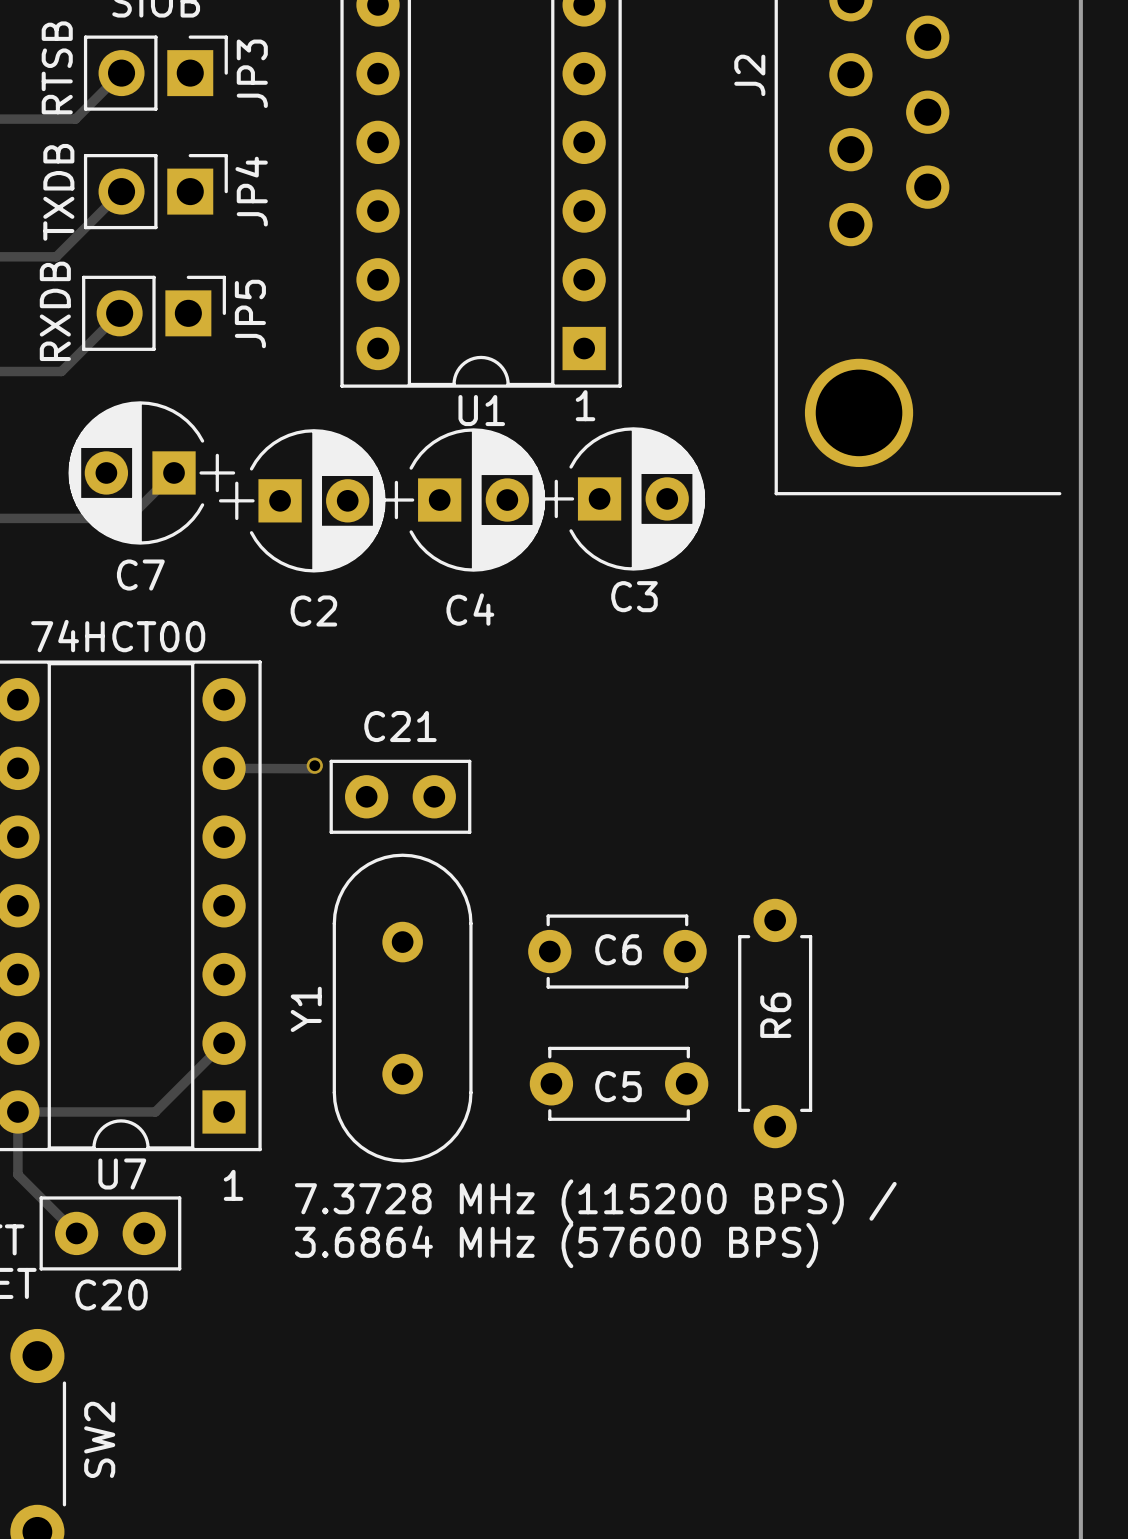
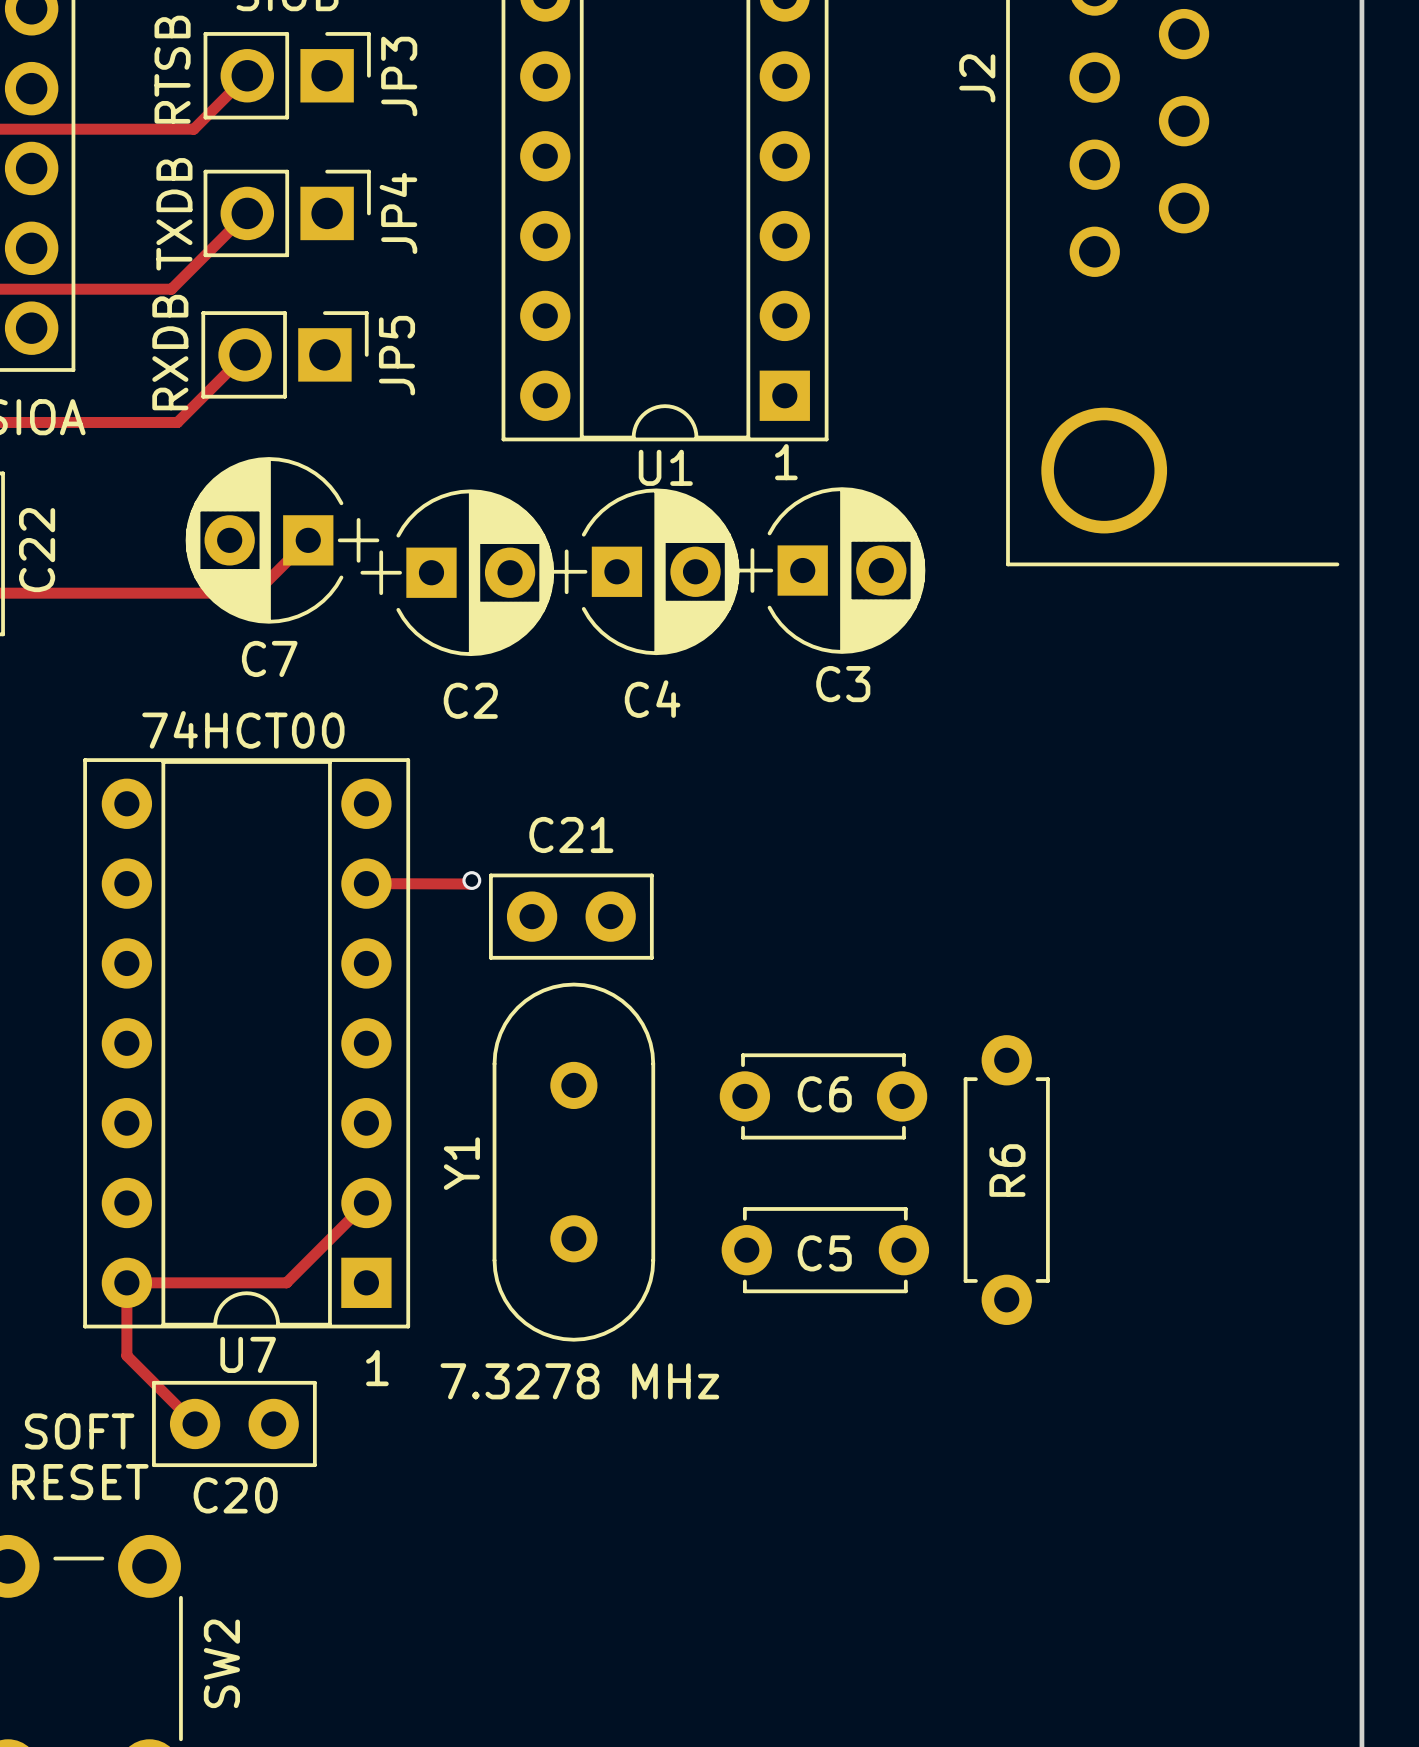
text: none -> 7.3278 MHz (579, 1381)
text: 7.3728 MHz (115200 BPS) / (595, 1201) -> none
text: 3.6864 MHz (57600 BPS) (556, 1245) -> none

